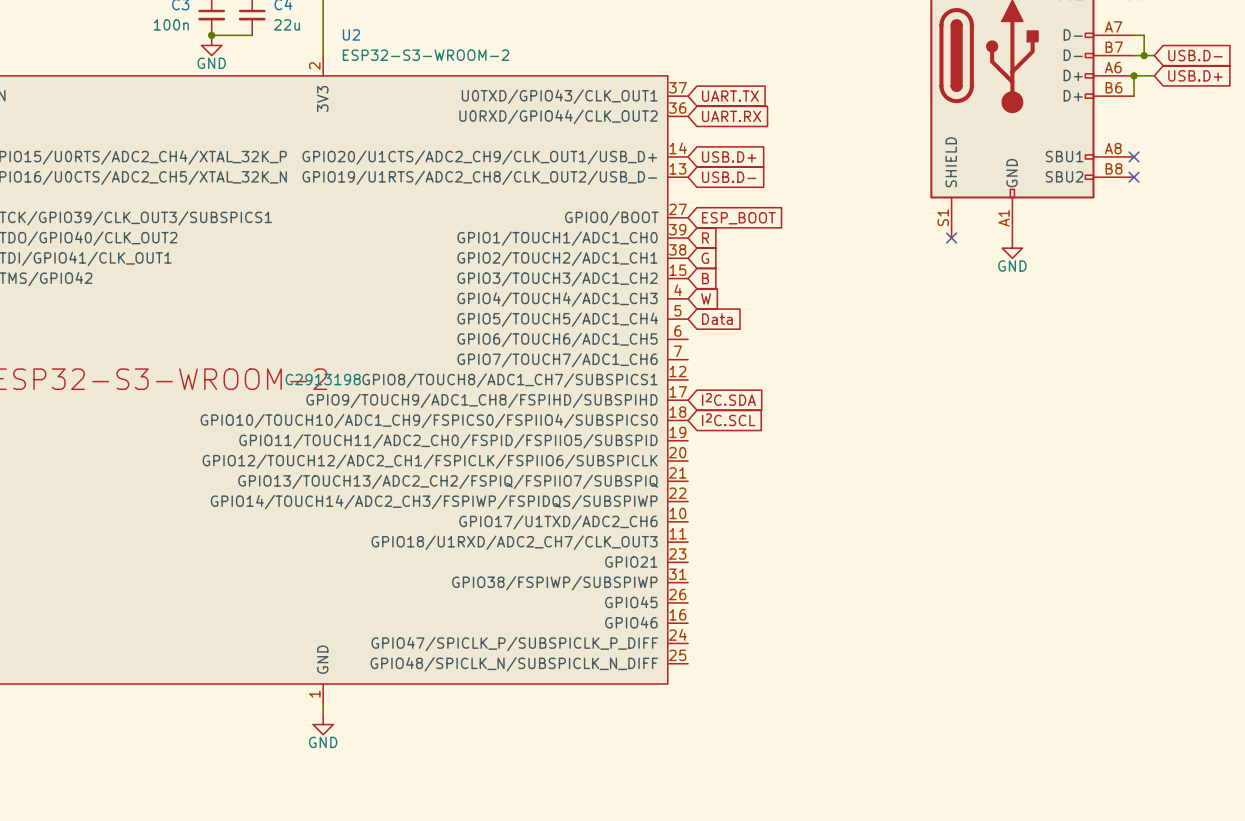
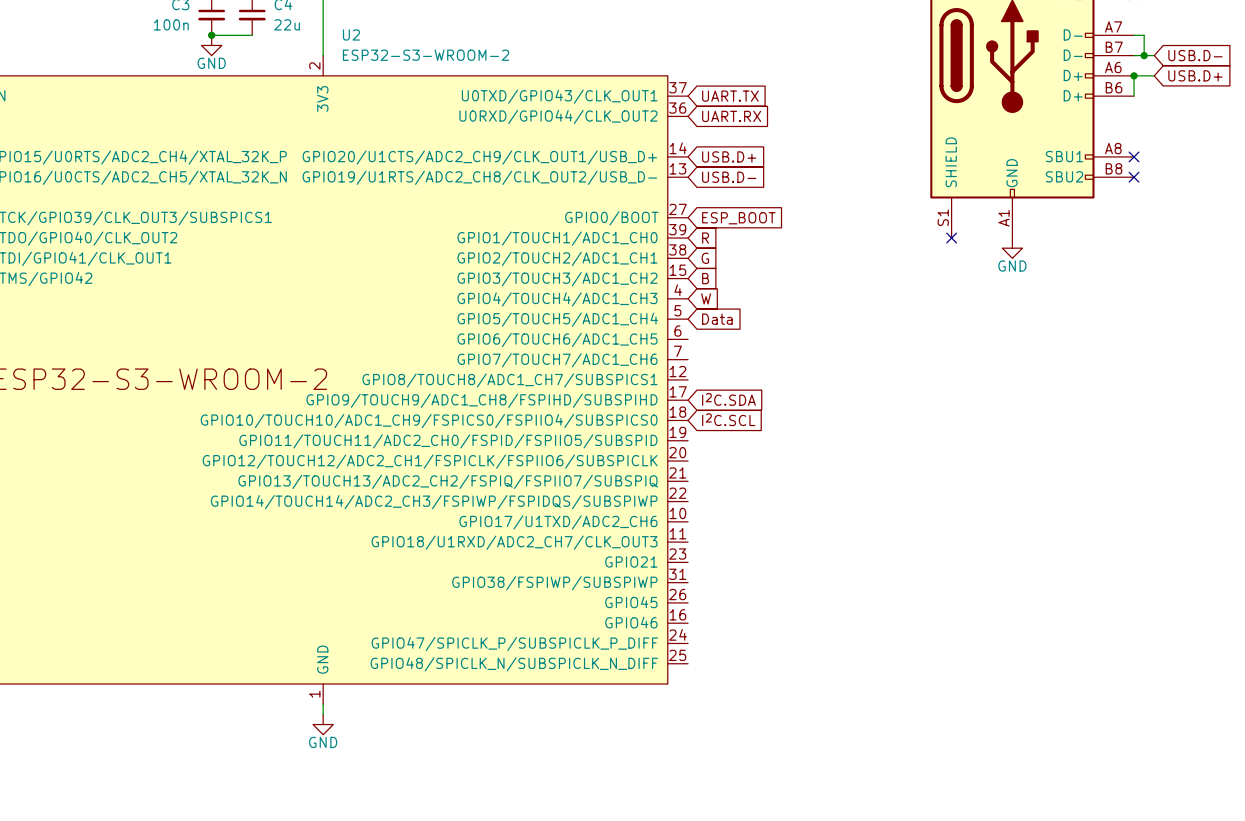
U2 text: C2913198 (323, 379) -> none

